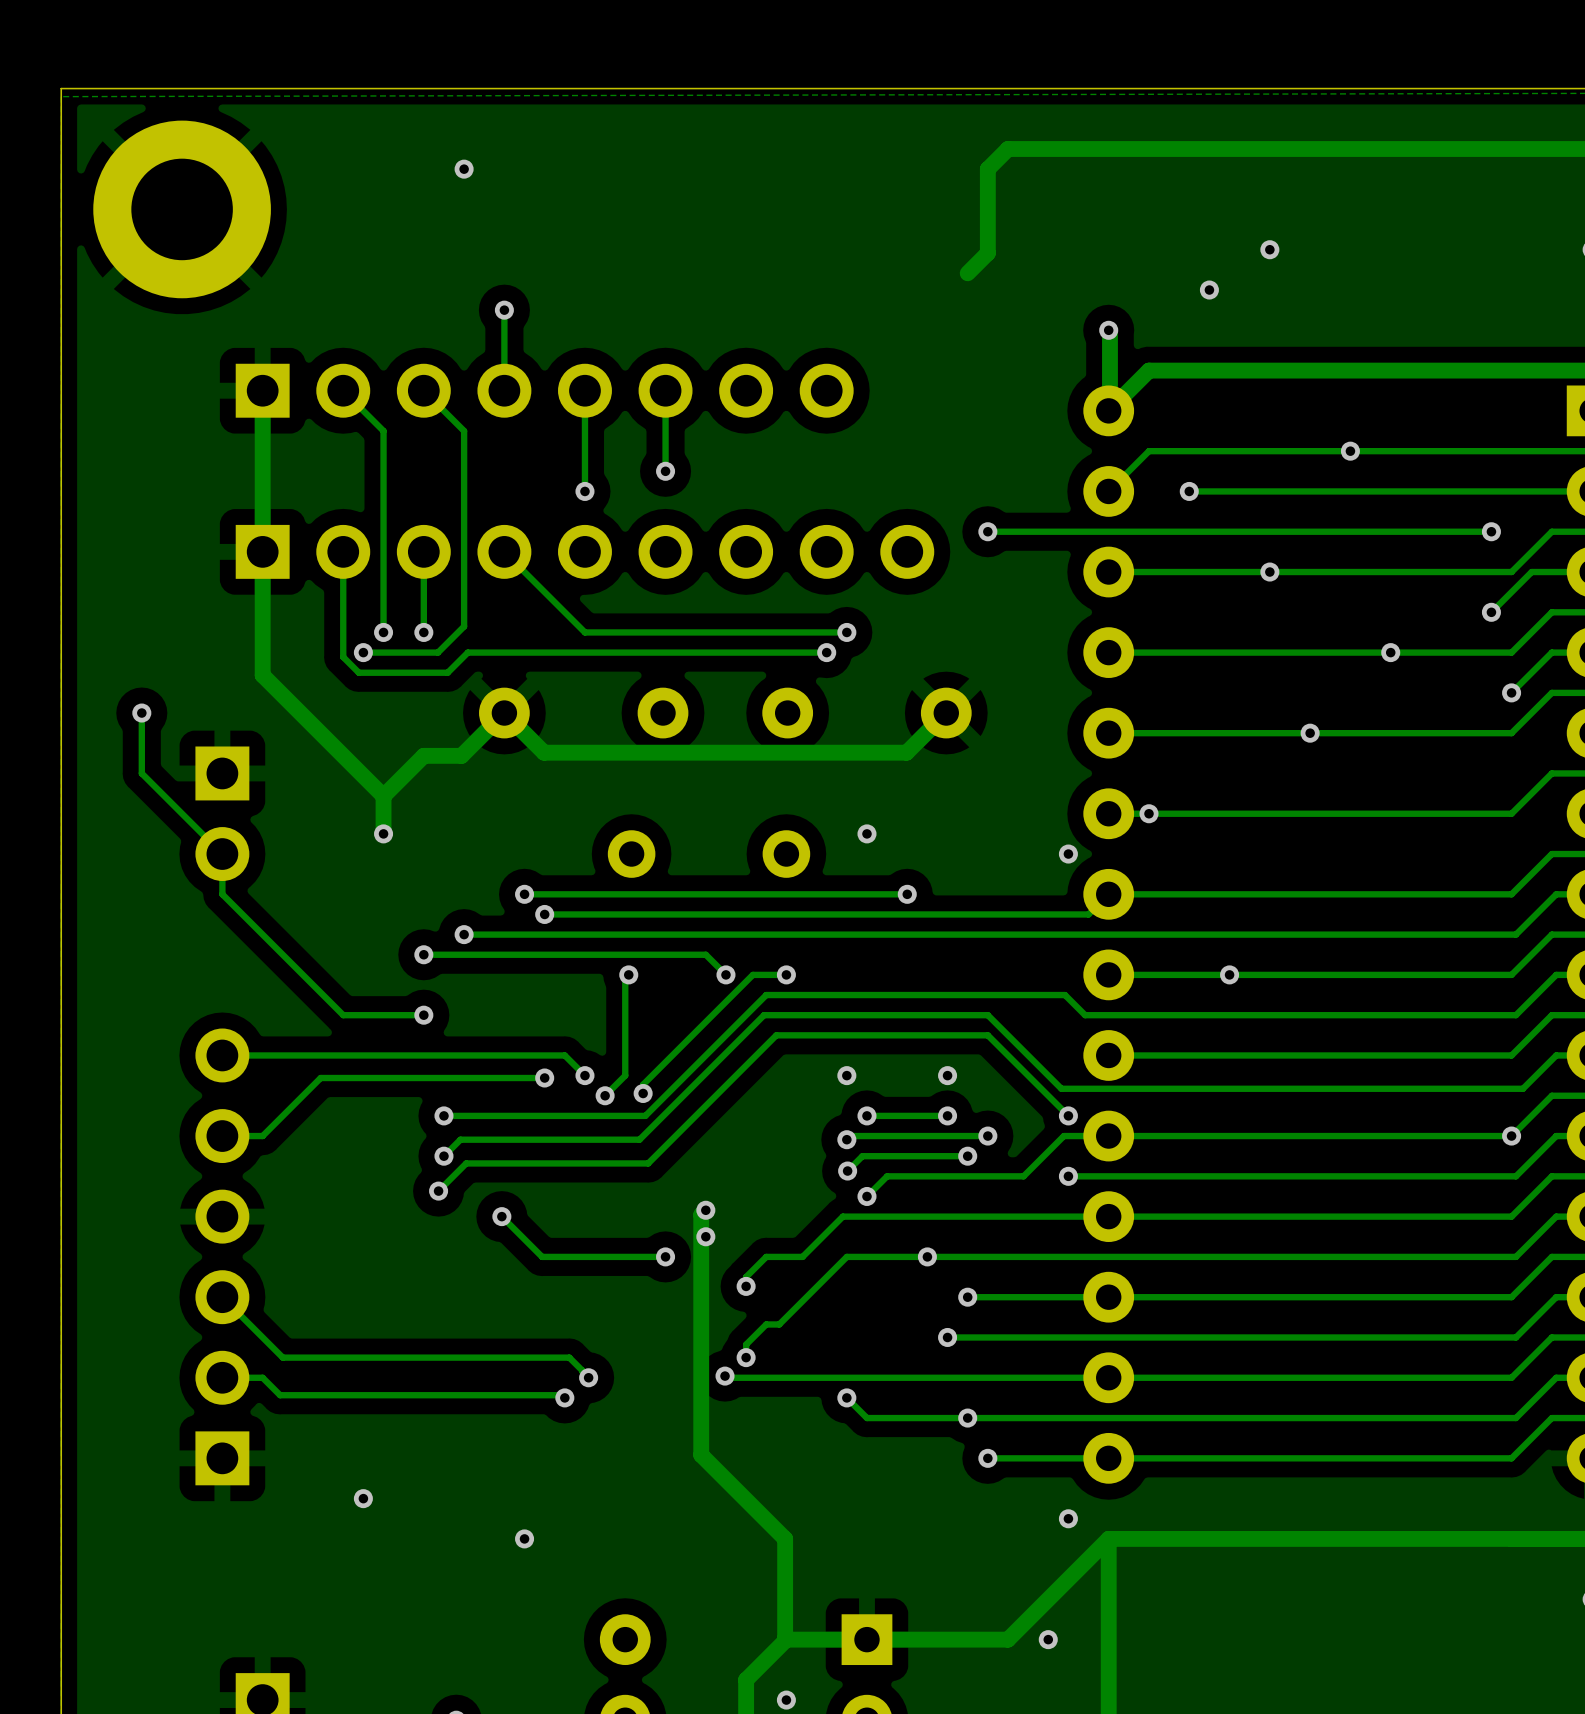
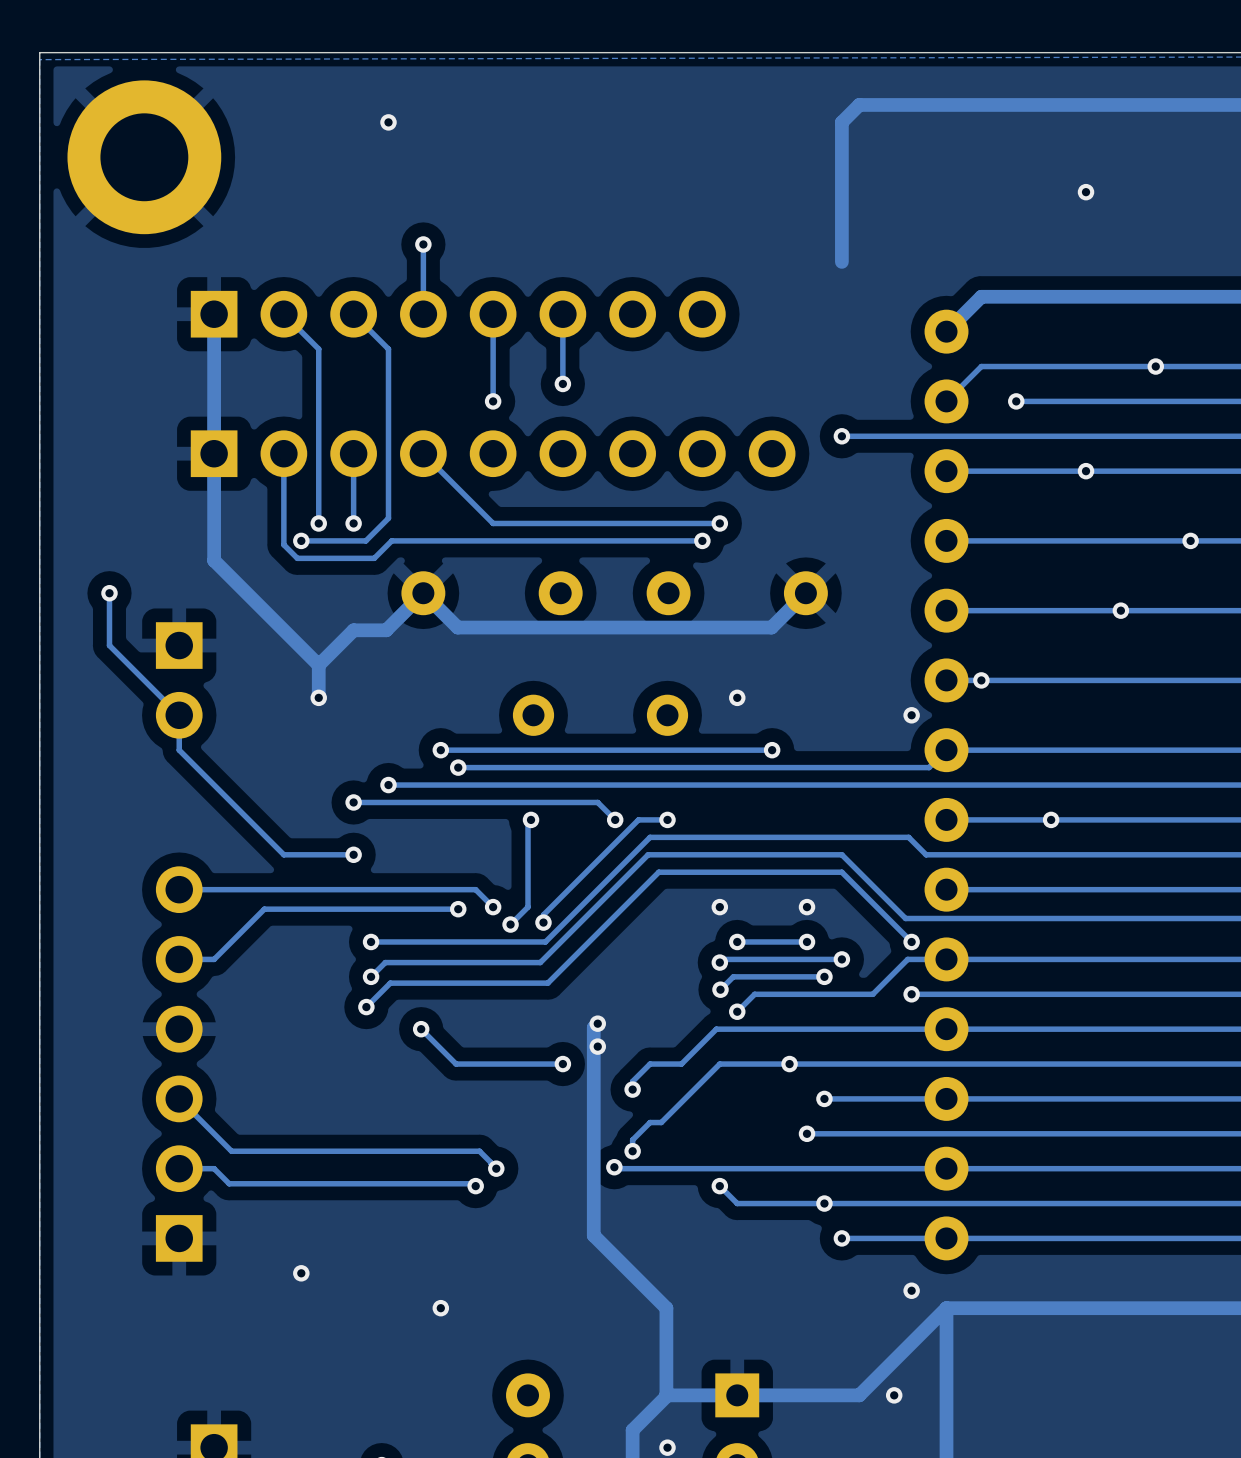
track: (987, 253) (967, 273) -> (841, 195) (841, 261)
via: (1209, 290) -> none
track: (1108, 330) (1109, 409) -> none
via: (1108, 330) -> none

